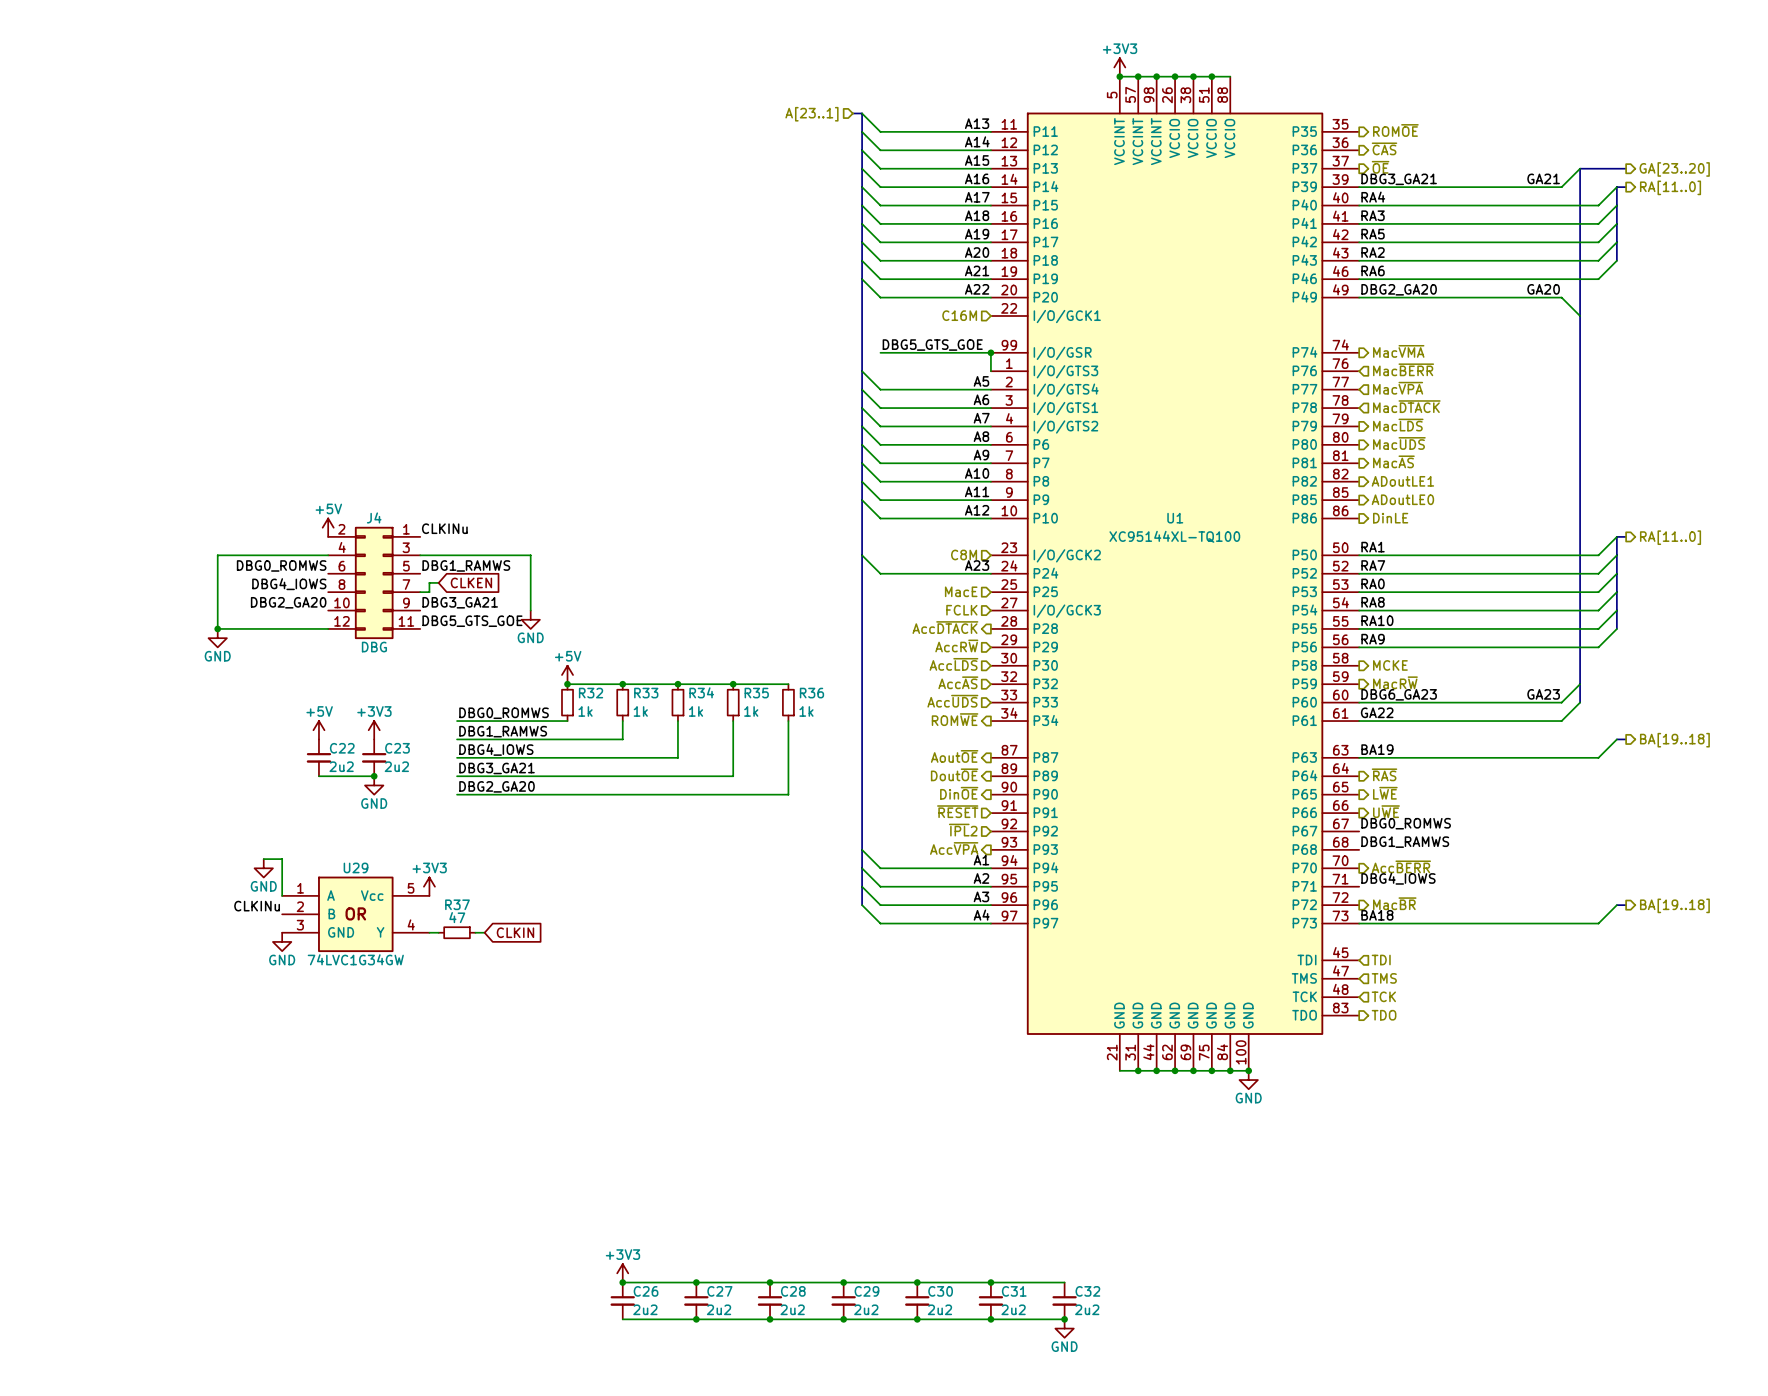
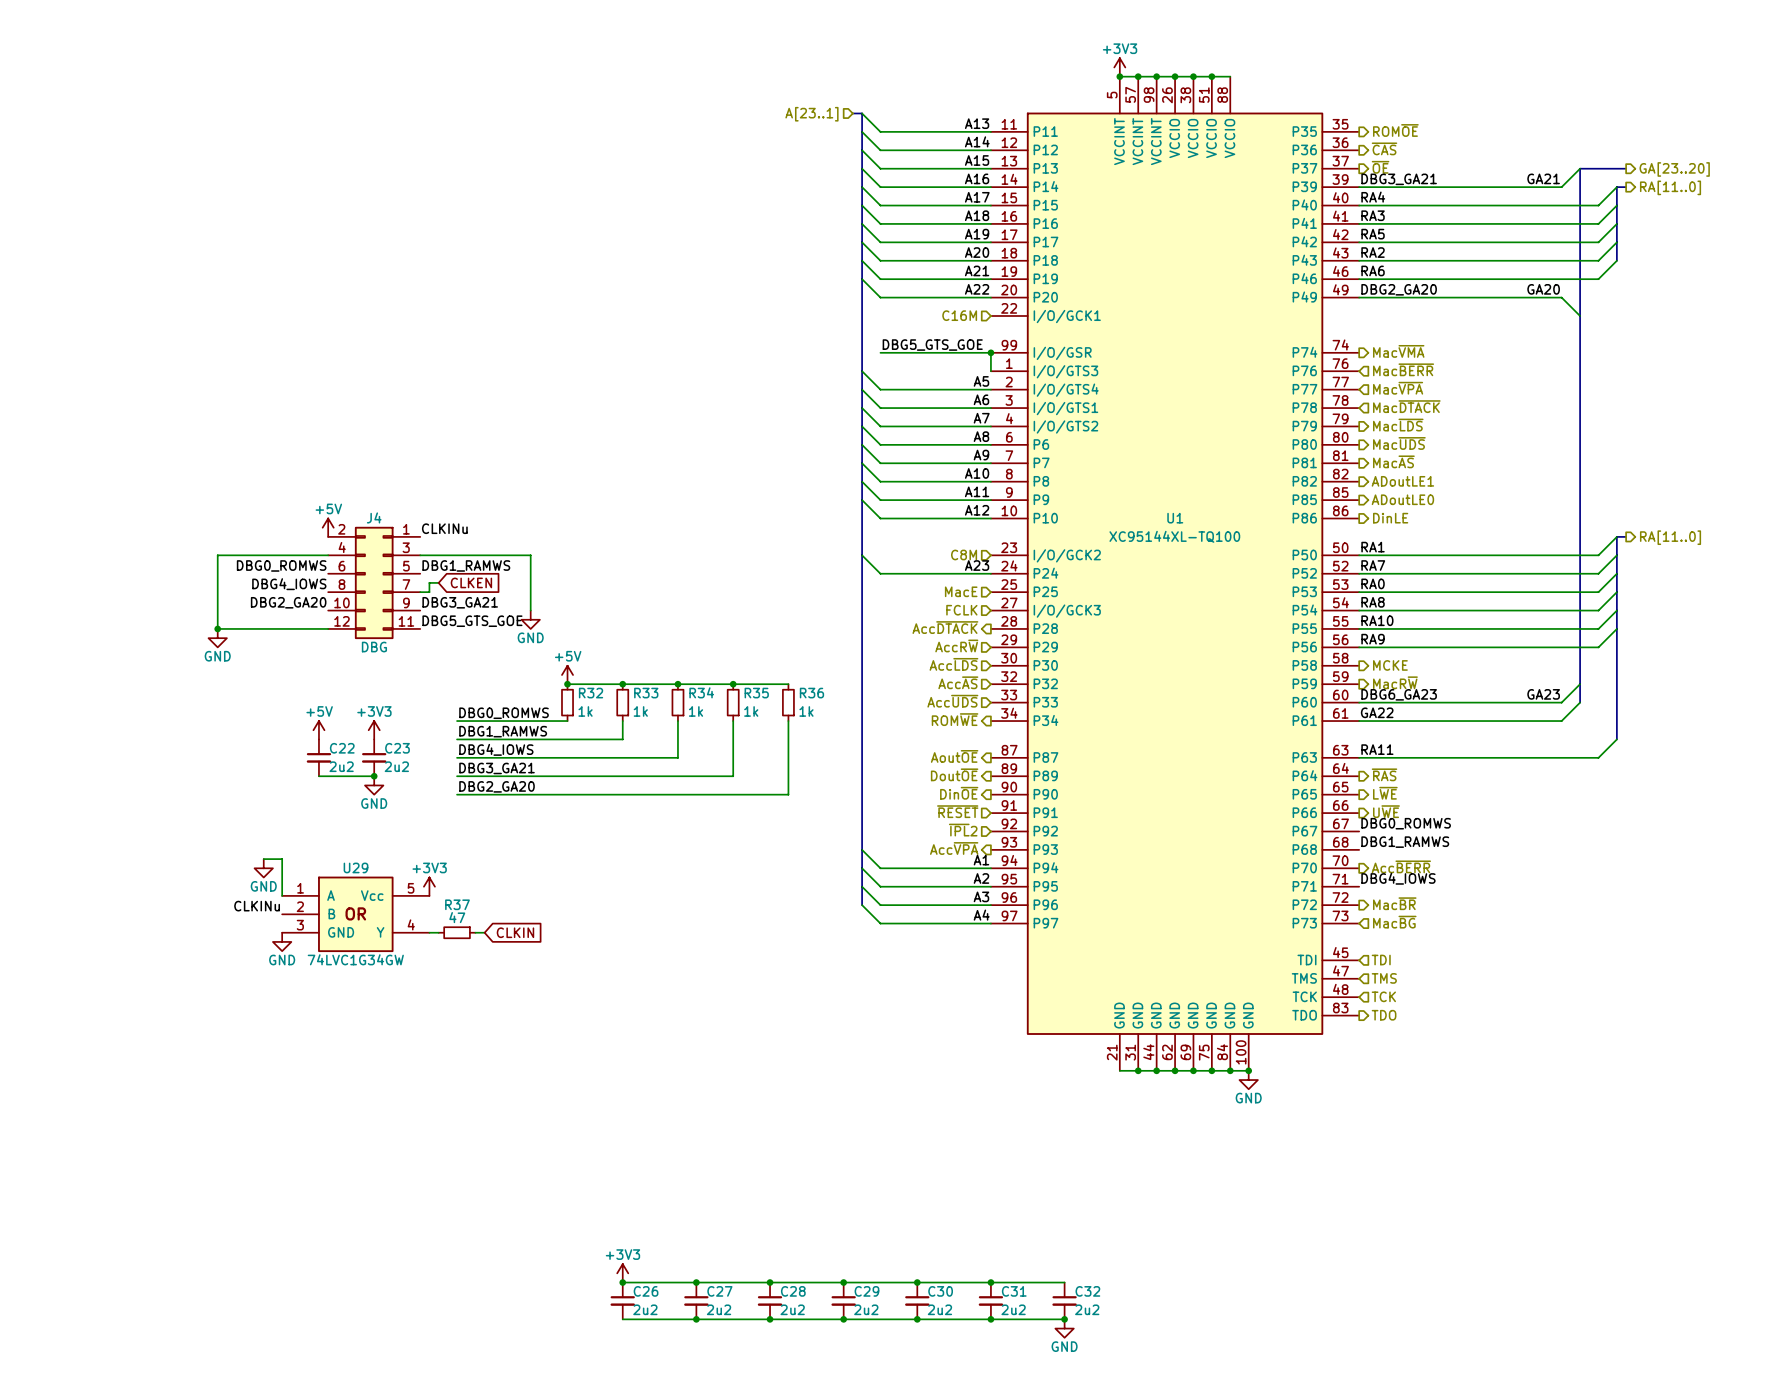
bus: (1616, 739) (1626, 739) -> (1616, 739) (1616, 628)
hierarchical label: BA[19..18] (1674, 740) -> none
label: BA19 (1377, 749) -> RA11 (1377, 749)
wire: (1616, 905) (1598, 923) (1359, 923) -> none
bus: (1616, 905) (1626, 905) -> none
hierarchical label: BA[19..18] (1674, 905) -> none
label: BA18 (1377, 915) -> none
hierarchical label: none -> Mac~{BG} (1394, 922)

